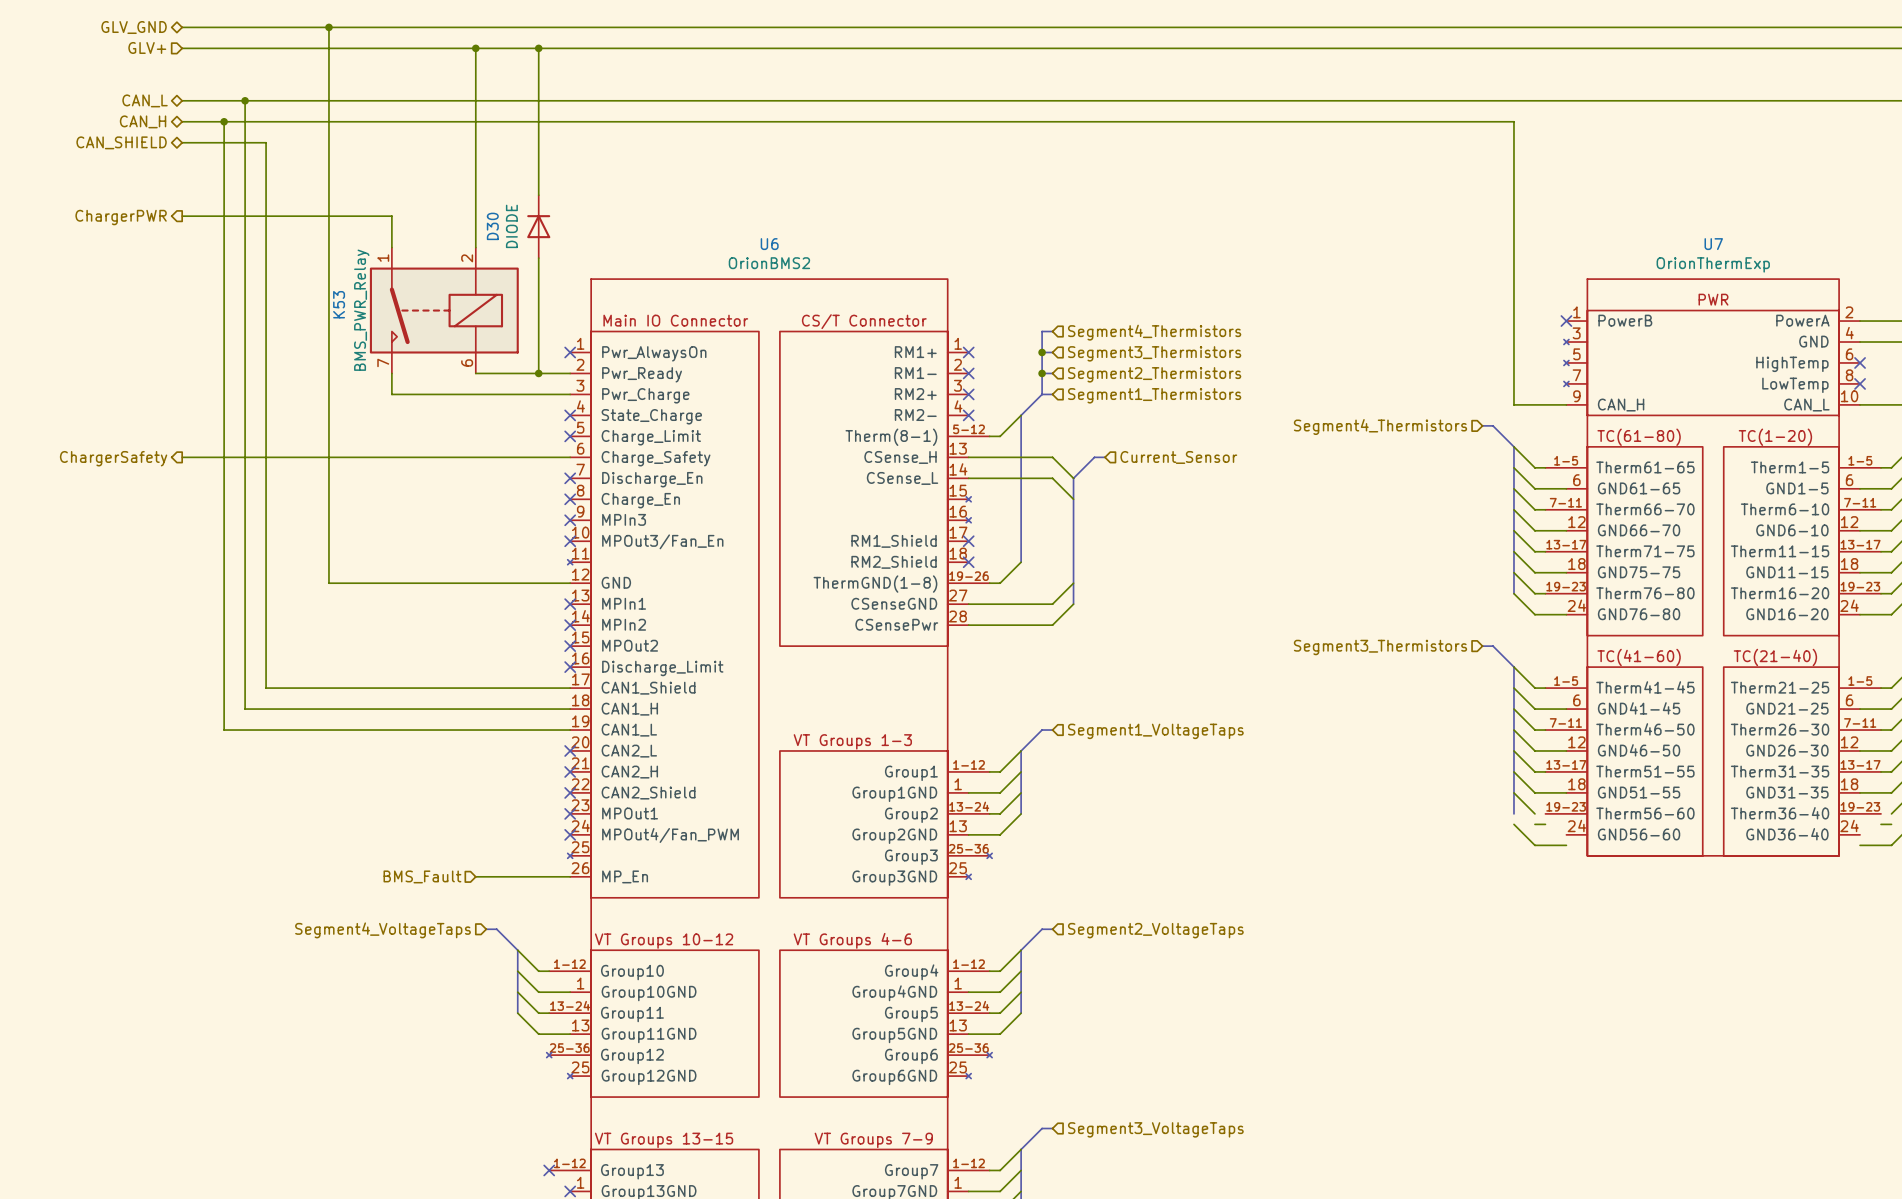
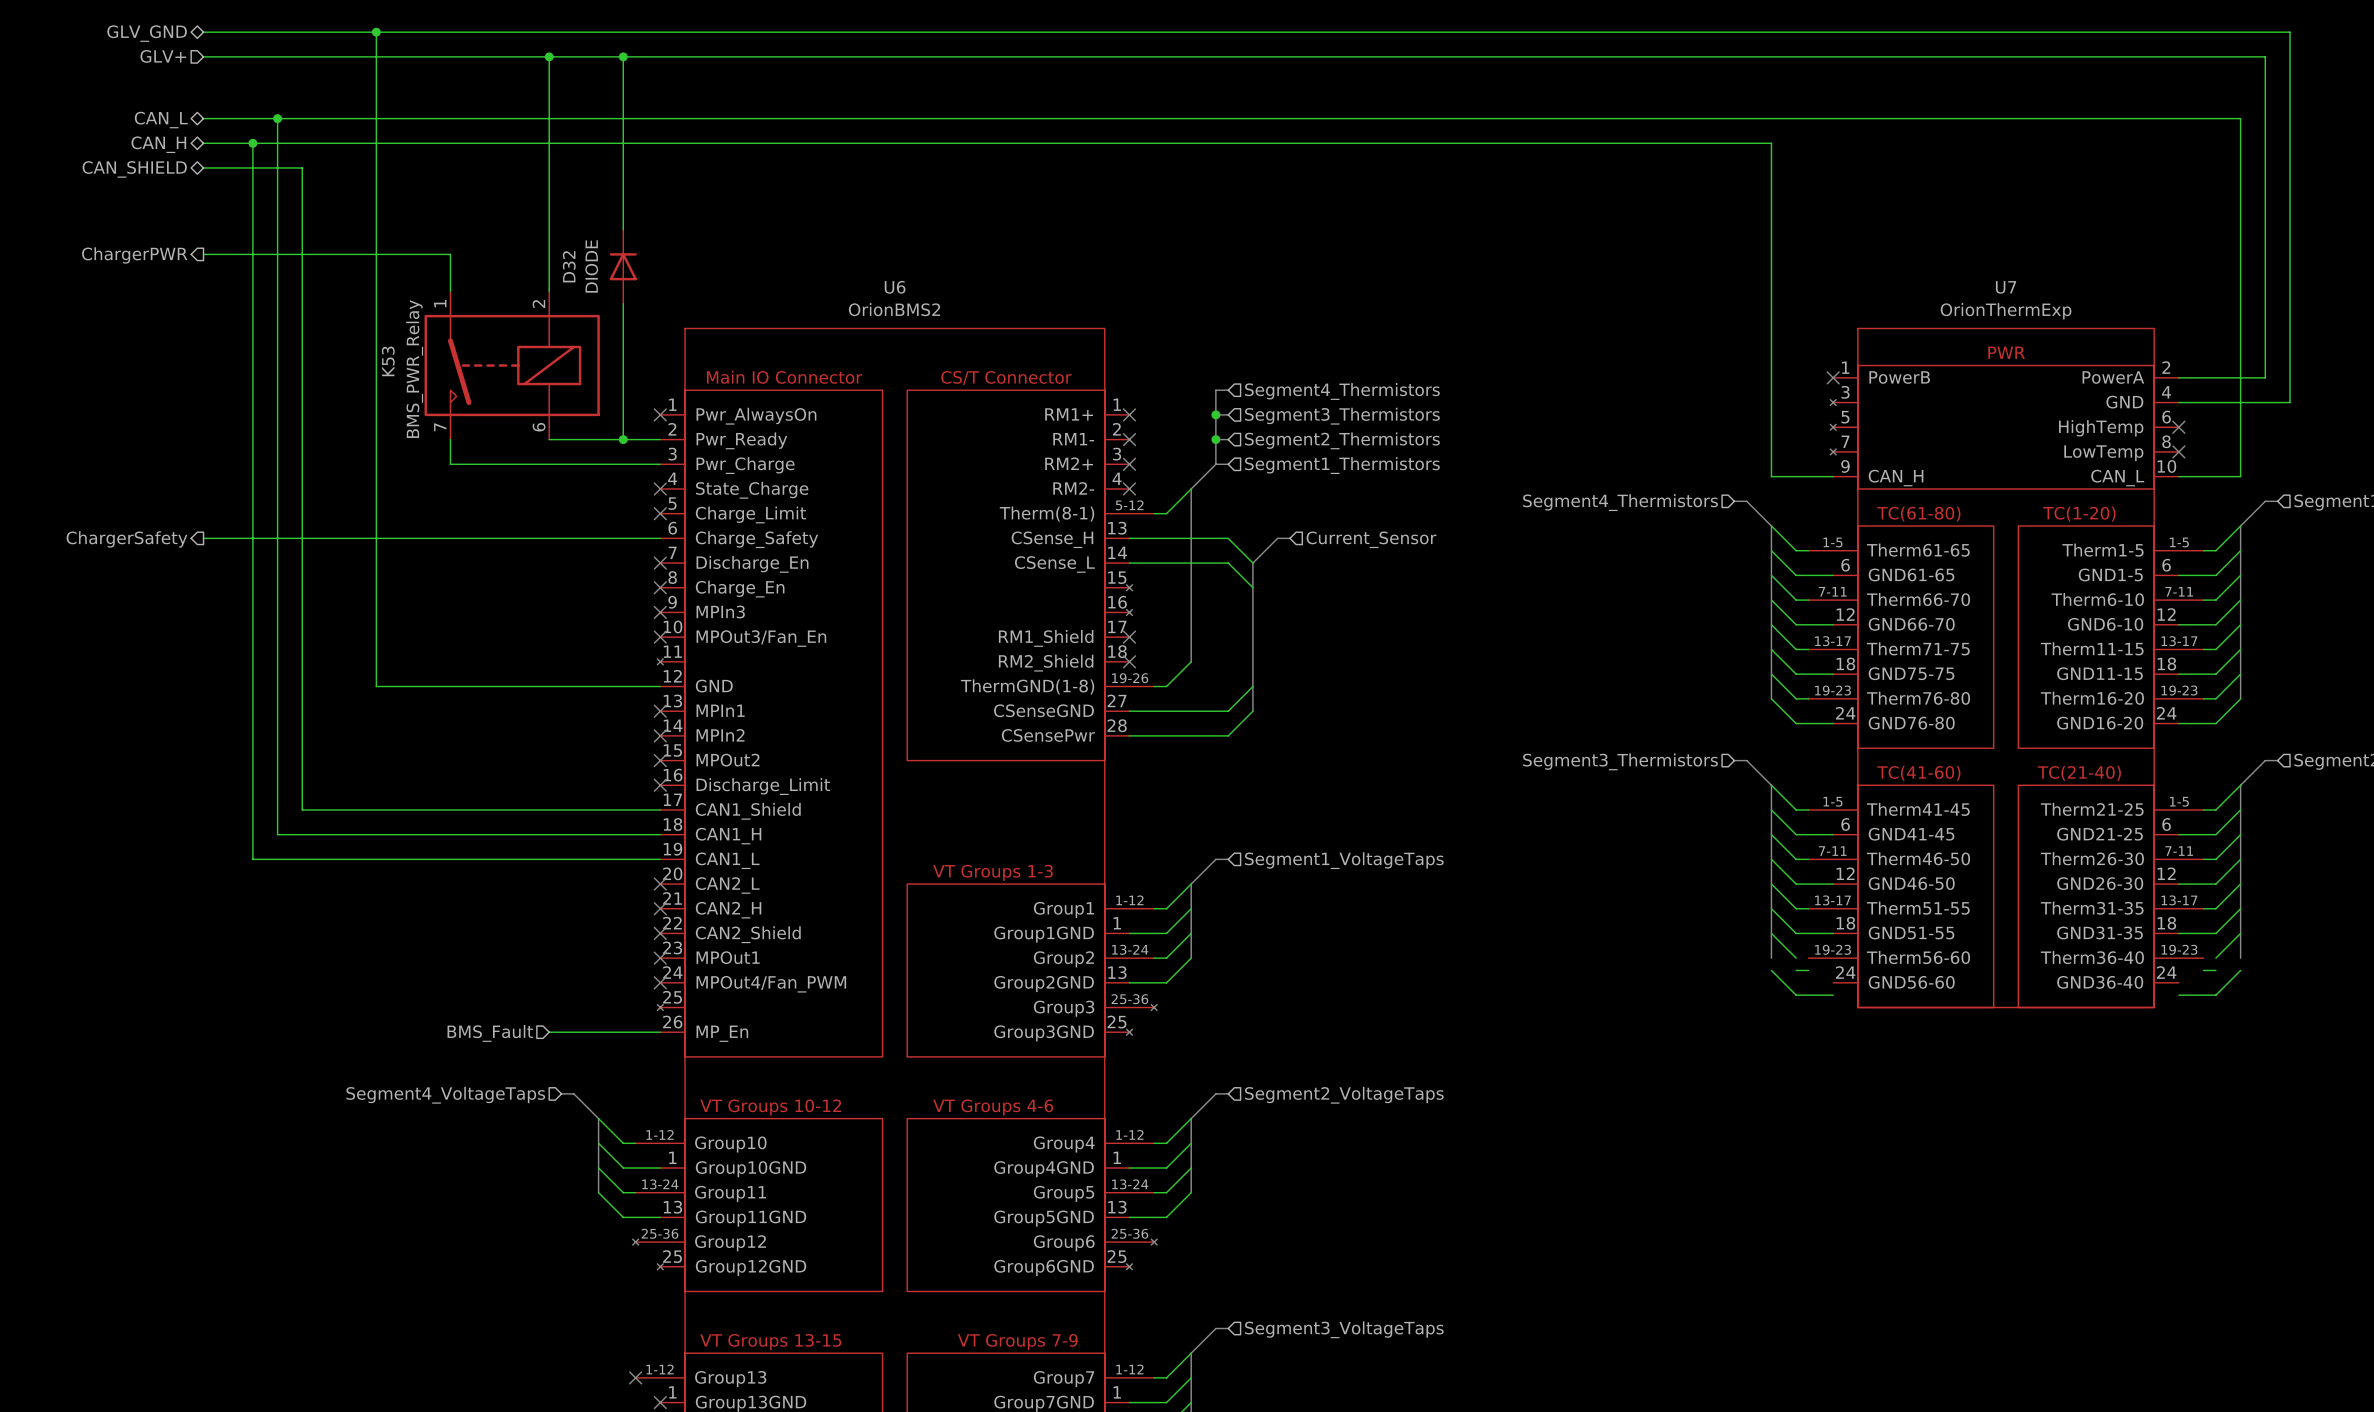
D30 name: D30 (492, 226) -> D32 (569, 266)

